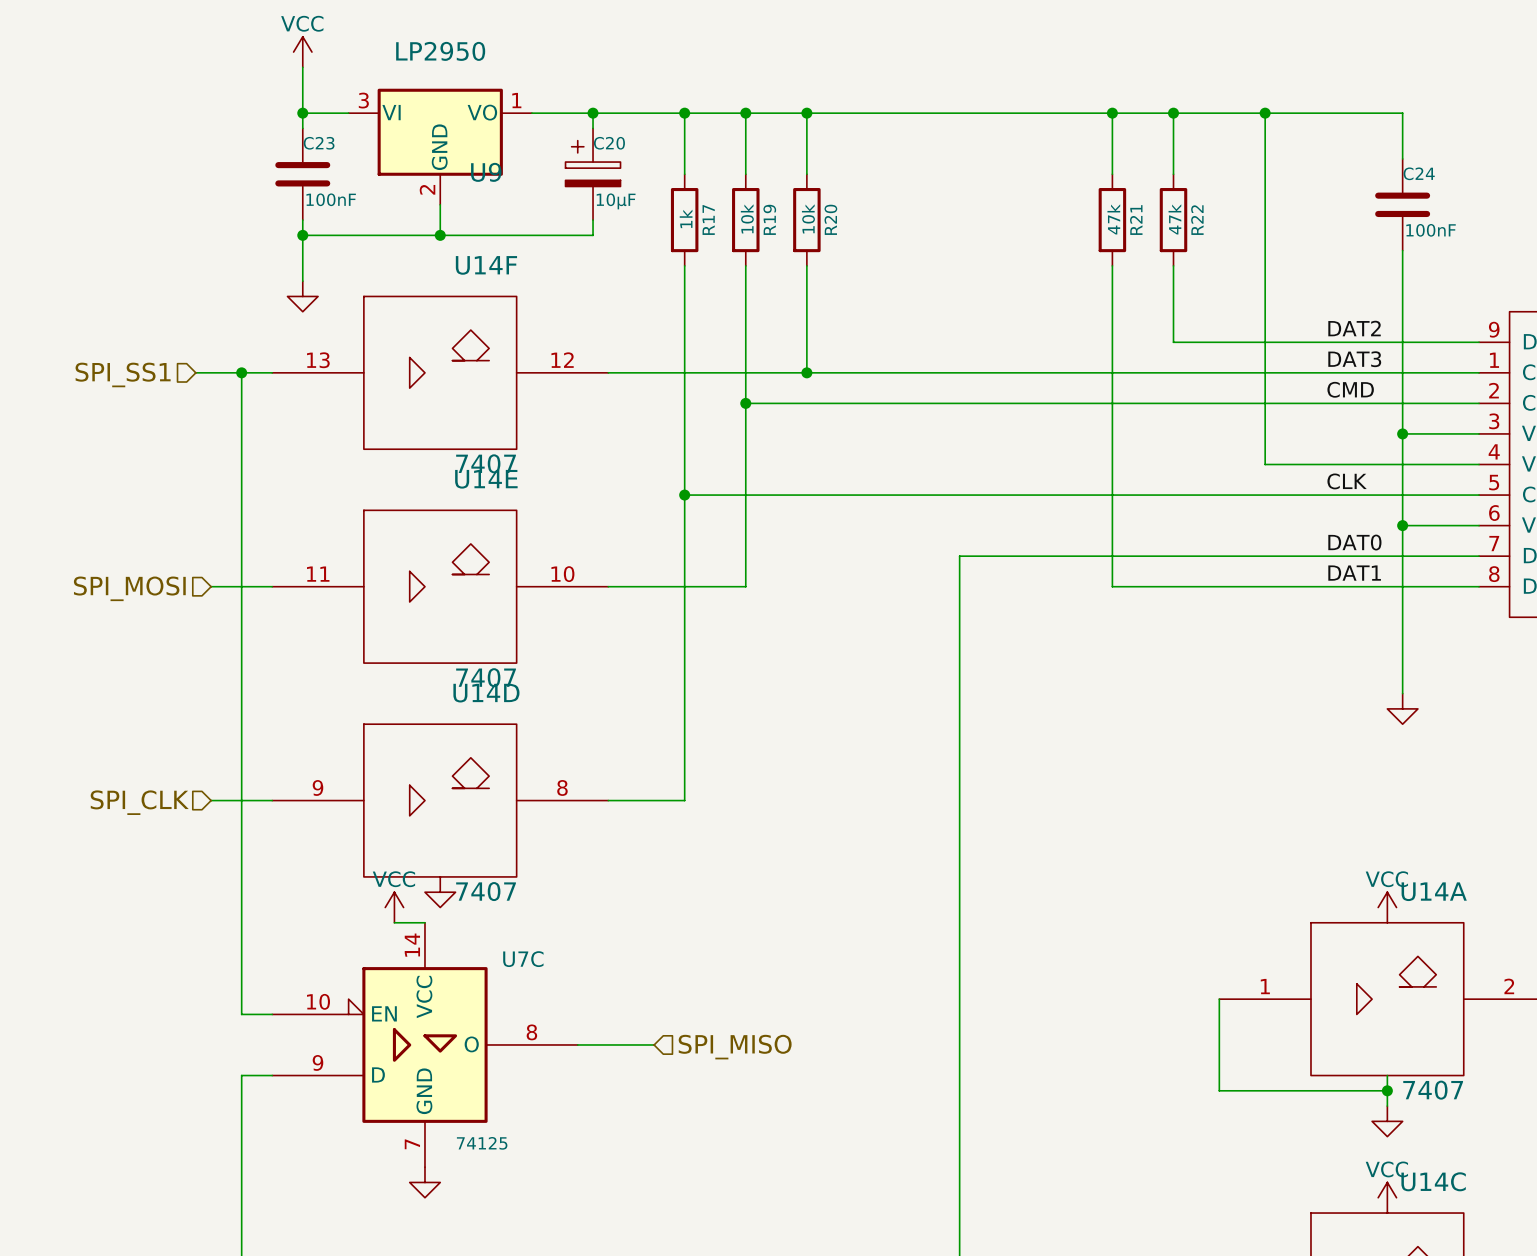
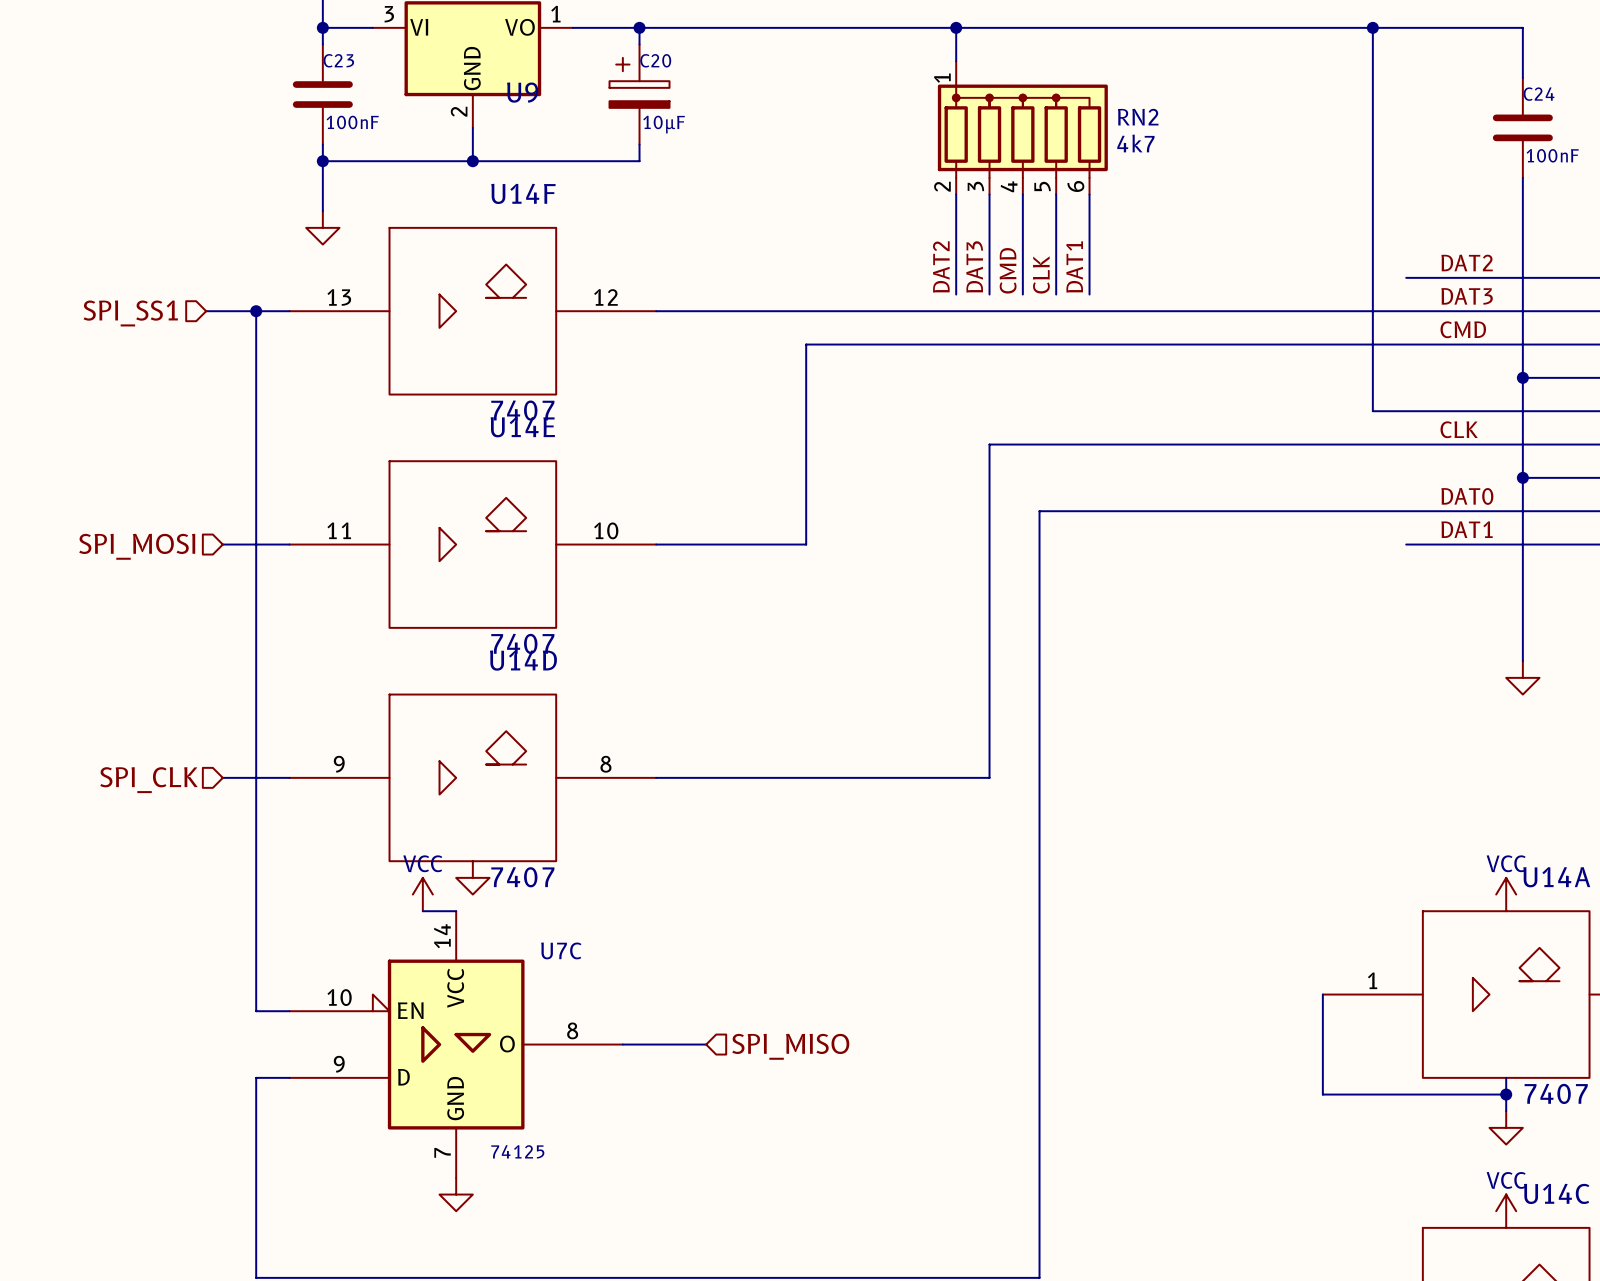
wire: (684, 113) (684, 174) -> none
junction: (684, 113) -> none
wire: (745, 113) (745, 174) -> none
junction: (745, 113) -> none
wire: (806, 113) (806, 174) -> none
junction: (806, 113) -> none
wire: none -> (956, 27) (956, 61)
junction: none -> (956, 27)
wire: (1112, 113) (1112, 174) -> none
junction: (1112, 113) -> none
wire: (1173, 113) (1173, 174) -> none
junction: (1173, 113) -> none
RN2: none -> 4k7 (1022, 127)
R17: 1k (684, 220) -> none
R19: 10k (745, 220) -> none
R20: 10k (806, 220) -> none
R21: 47k (1112, 220) -> none
R22: 47k (1173, 220) -> none
wire: (684, 265) (684, 800) -> none
wire: (745, 265) (745, 403) -> none
wire: (806, 265) (806, 372) -> none
wire: none -> (956, 194) (956, 294)
wire: none -> (989, 194) (989, 294)
wire: none -> (1022, 194) (1022, 294)
wire: none -> (1056, 194) (1056, 294)
wire: none -> (1089, 194) (1089, 294)
wire: (1112, 265) (1112, 586) (1295, 586) -> none
wire: (1173, 265) (1173, 342) (1295, 342) -> none
label: none -> DAT2 (941, 266)
label: none -> DAT3 (974, 266)
label: none -> DAT1 (1074, 267)
label: none -> CMD (1008, 270)
label: none -> CLK (1041, 274)
junction: (806, 372) -> none
junction: (745, 403) -> none
wire: (684, 495) (913, 495) -> (739, 777) (989, 777) (989, 444)
junction: (684, 495) -> none

